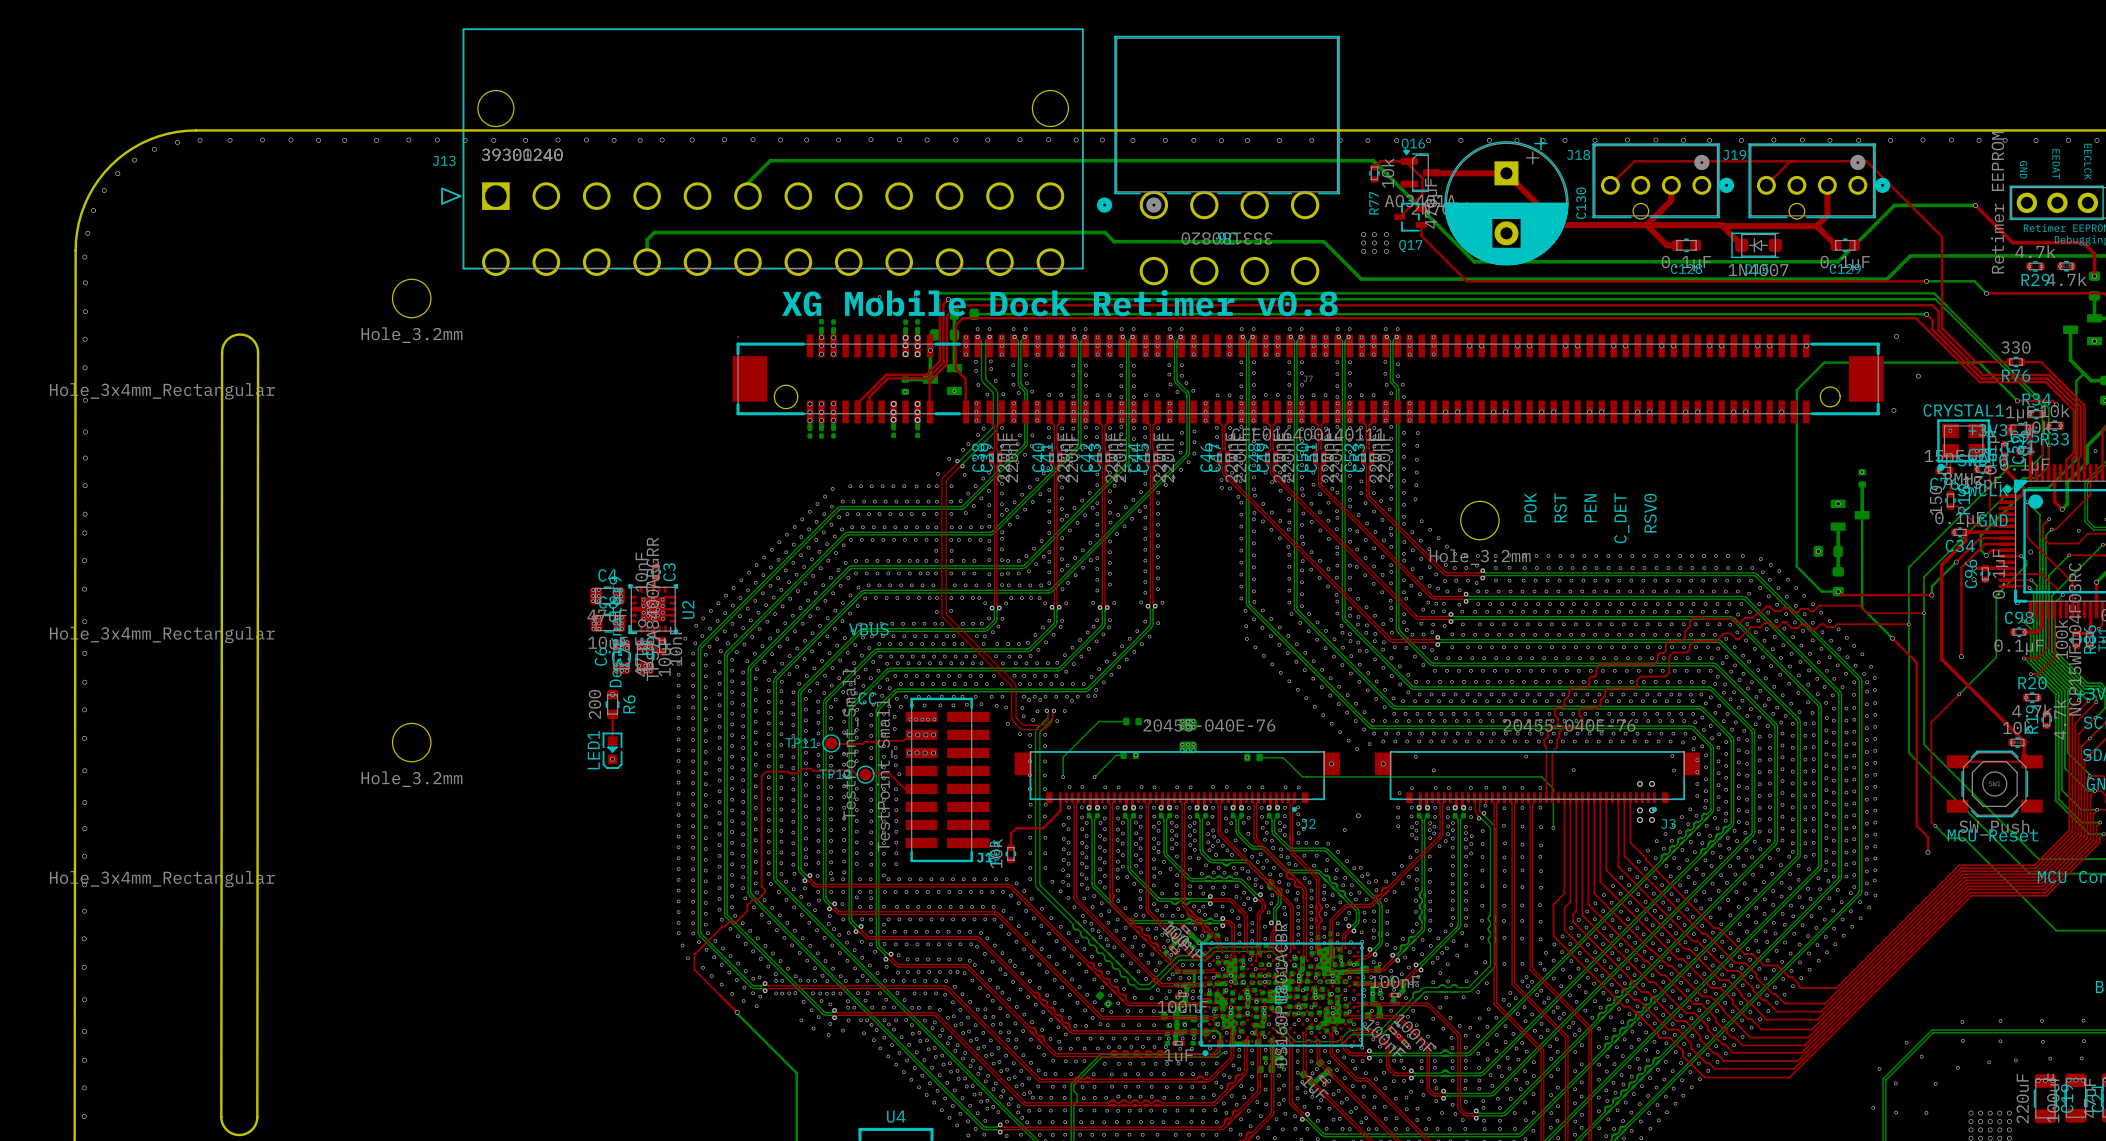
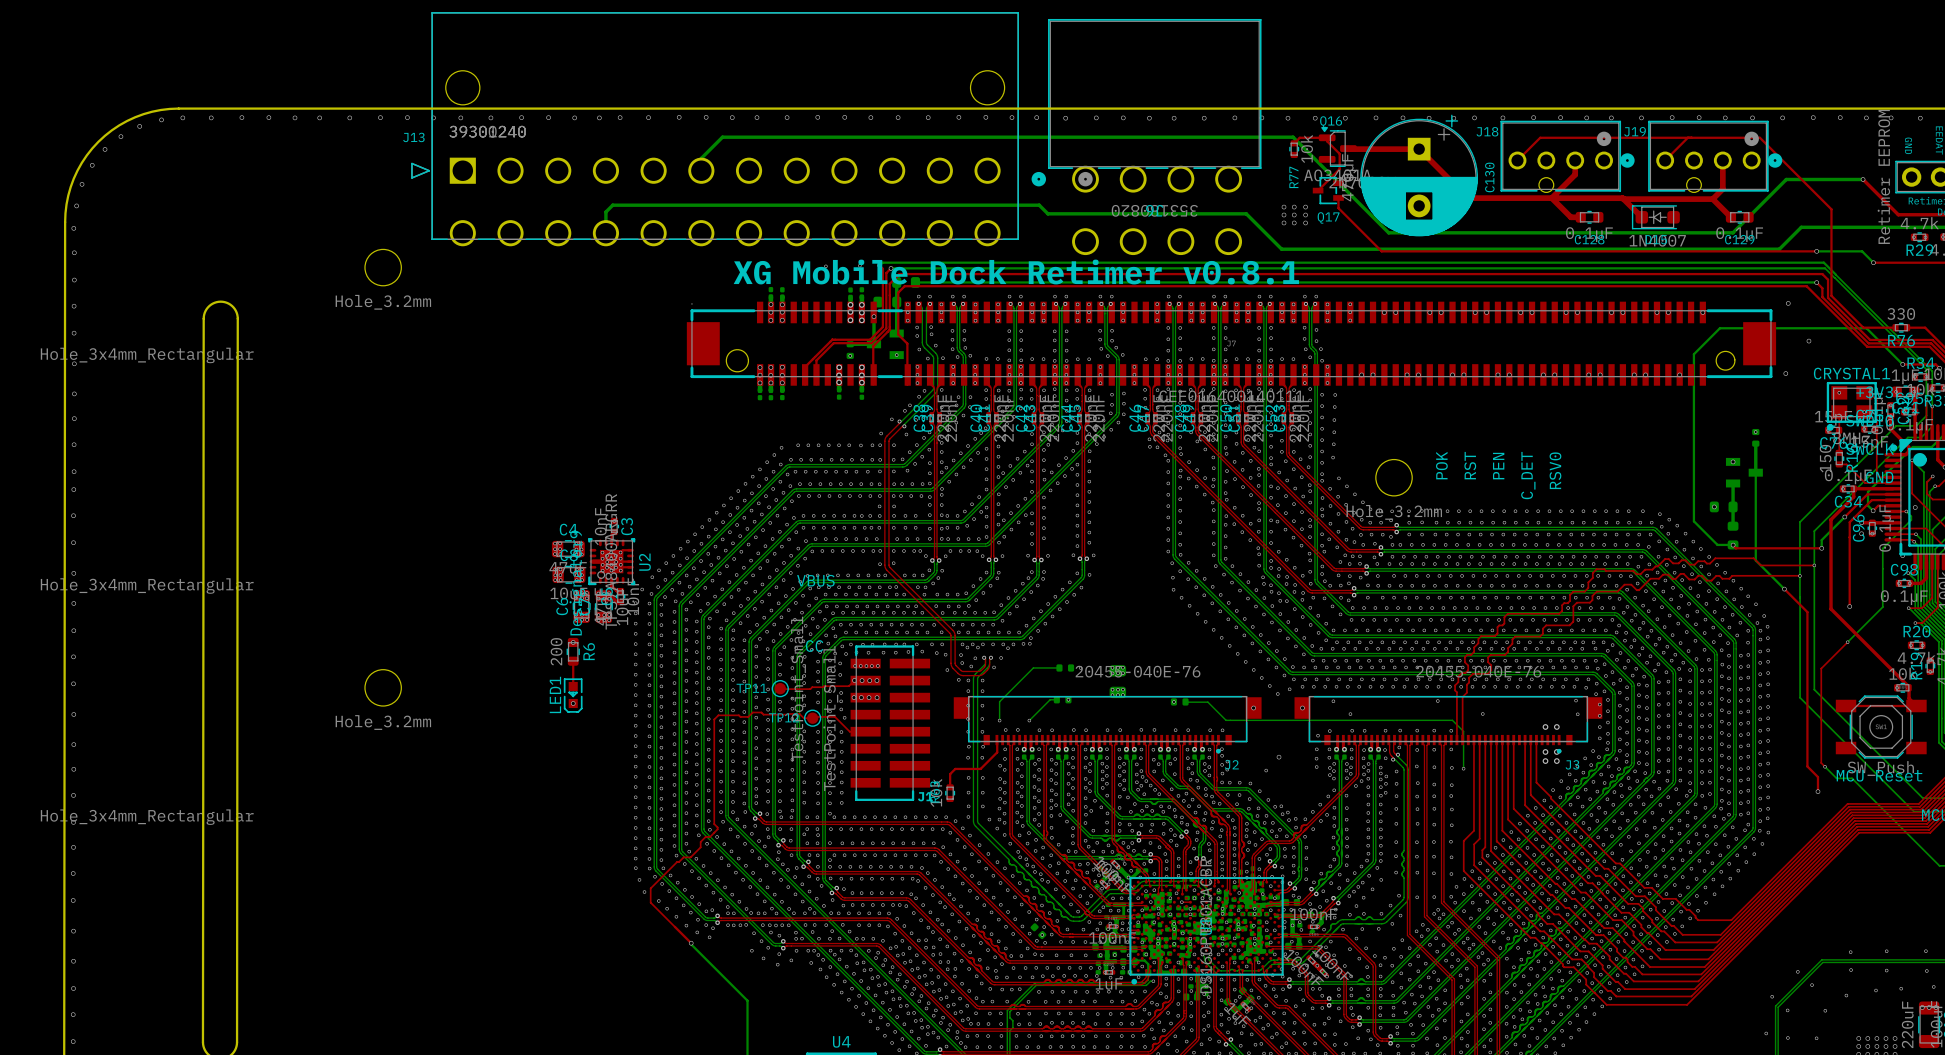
text: XG Mobile Dock Retimer v0.8 (1059, 303) -> XG Mobile Dock Retimer v0.8.1 (1016, 272)

